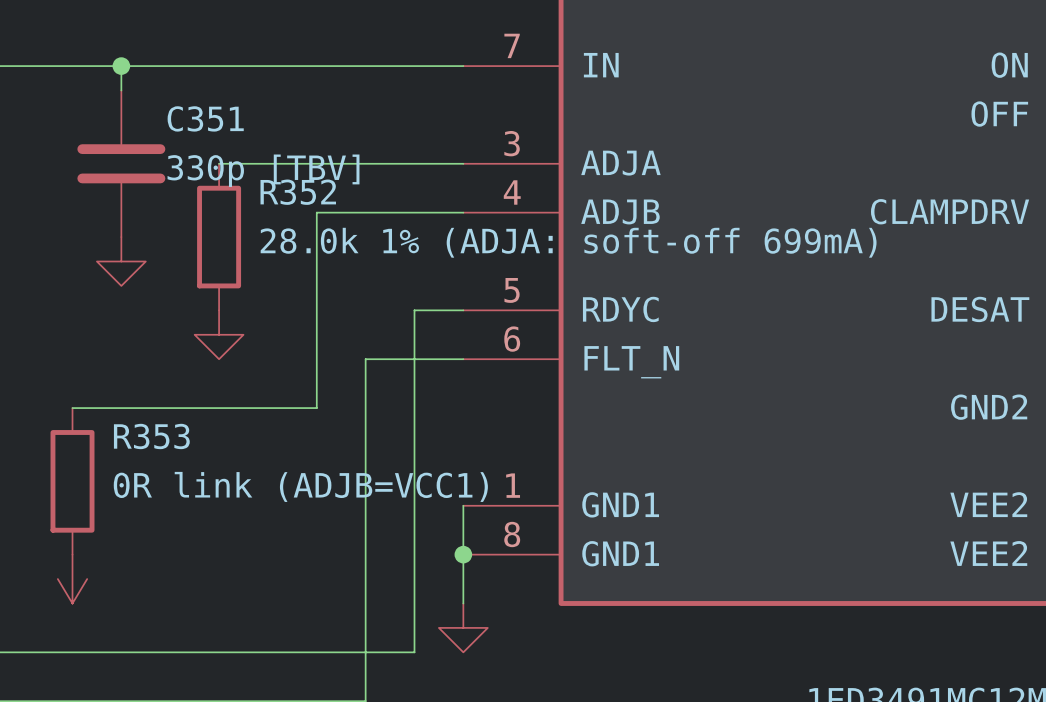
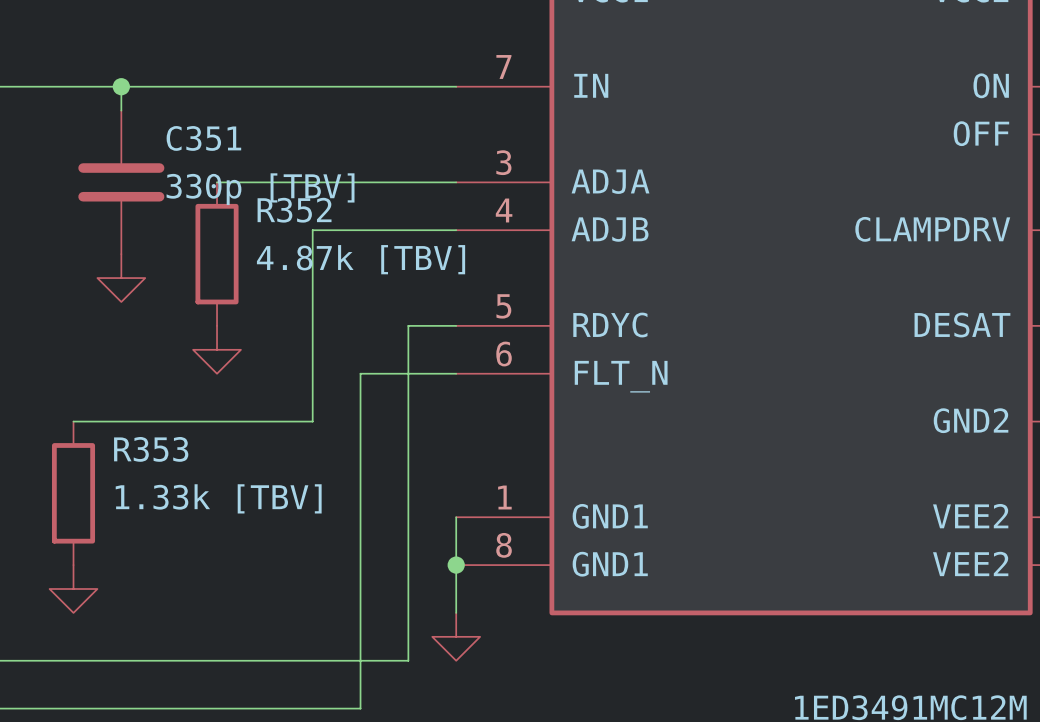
R352 value: 28.0k 1% (ADJA: soft-off 699mA) (568, 242) -> 4.87k [TBV] (361, 259)
R353 value: 0R link (ADJB=VCC1) (300, 486) -> 1.33k [TBV] (218, 498)
power symbol shape: [57, 554, 88, 604] -> [49, 565, 98, 613]

